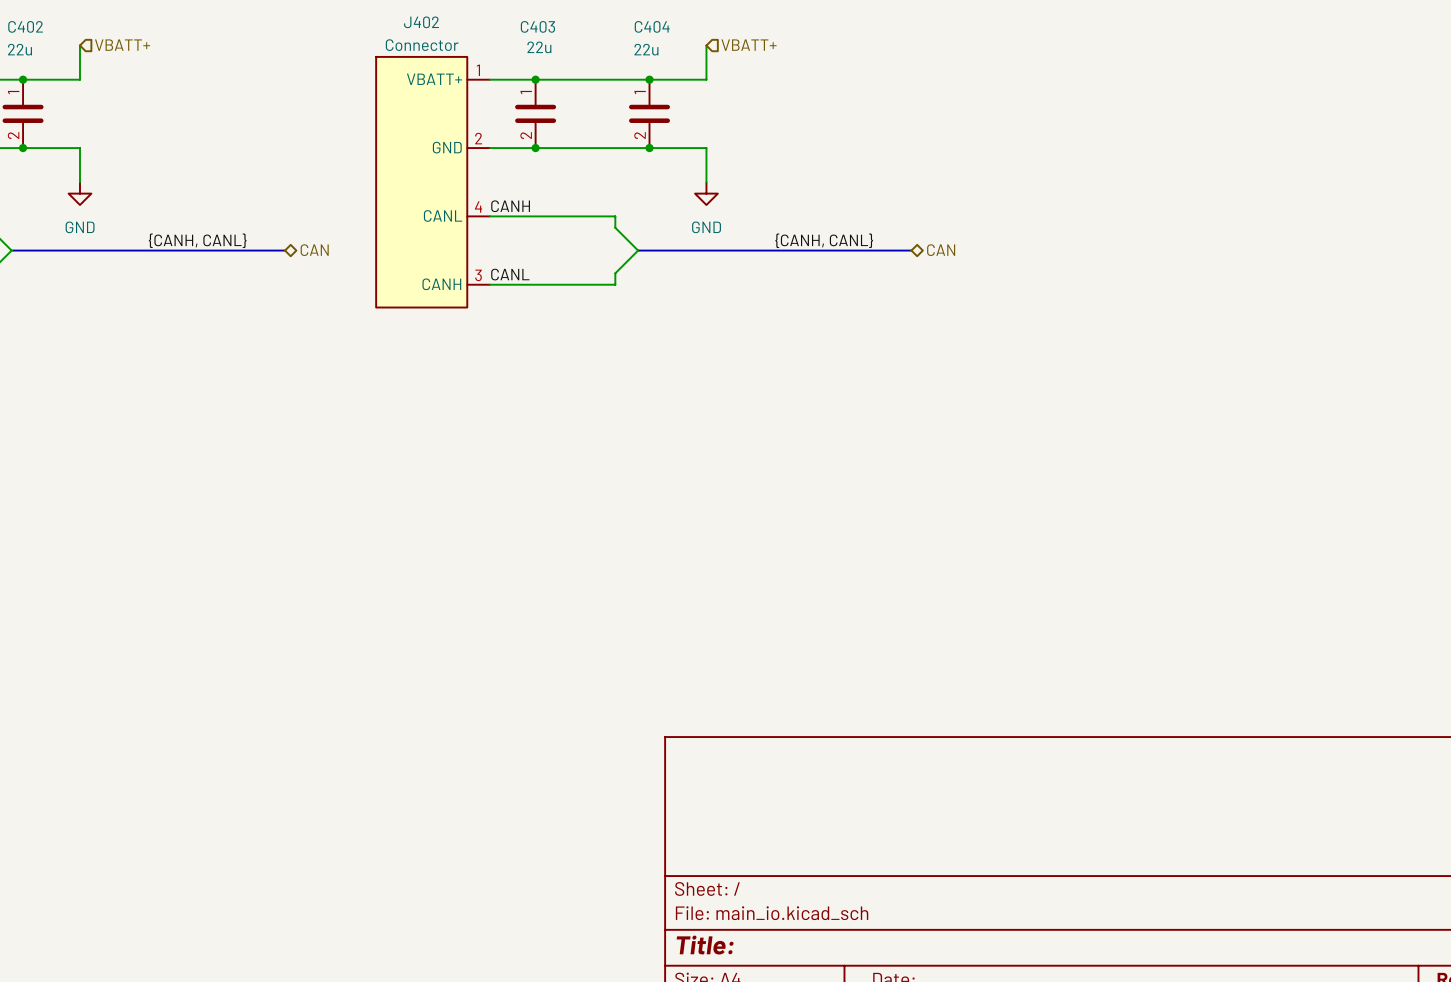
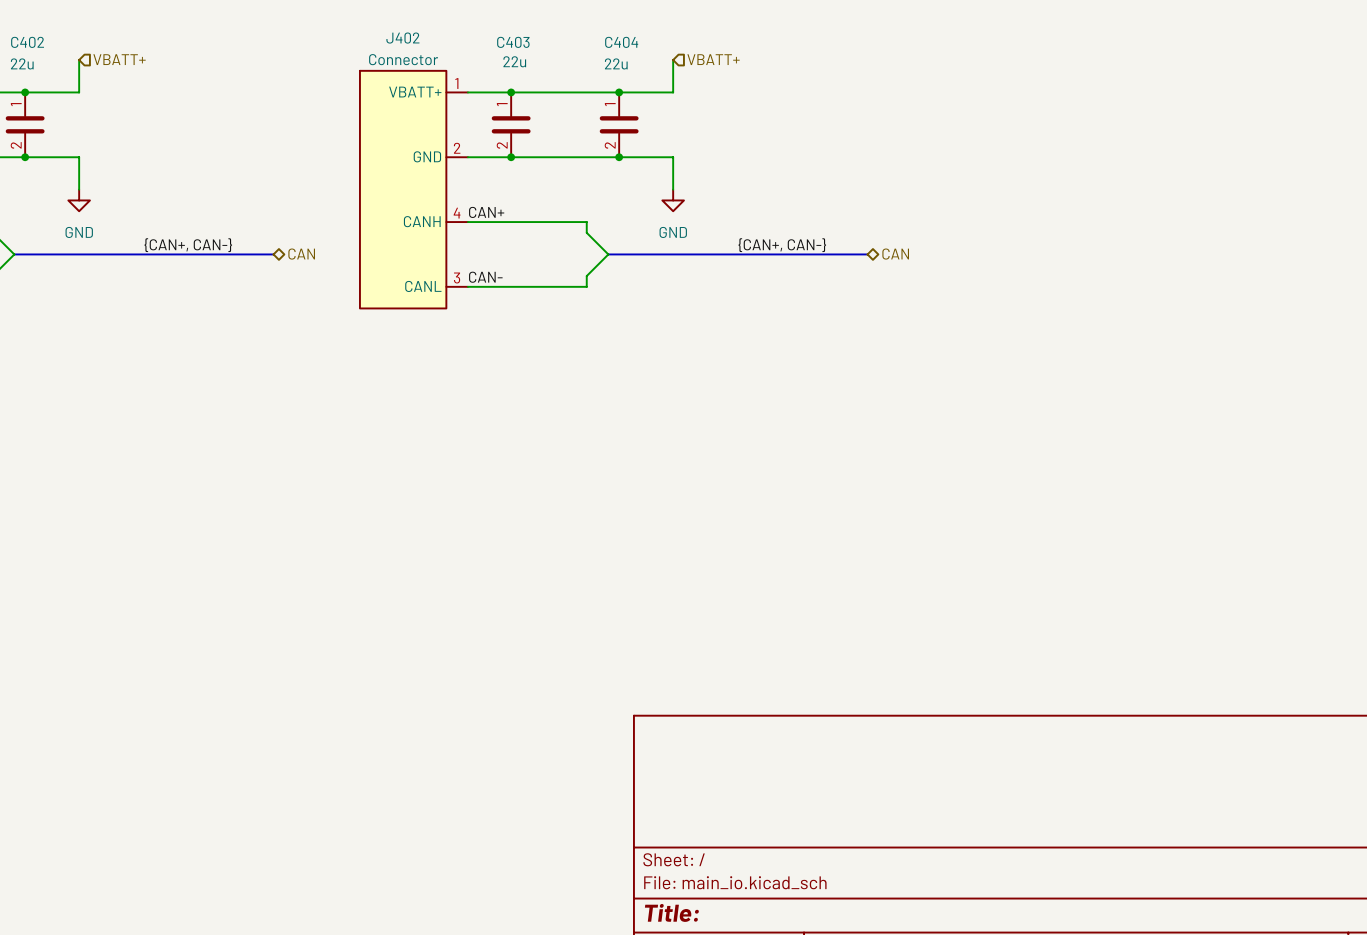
label: CANH (510, 206) -> CAN+ (486, 212)
J402 pin name: CANL (443, 215) -> CANH (422, 221)
label: {CANH, CANL} (197, 240) -> {CAN+, CAN-} (188, 245)
label: {CANH, CANL} (824, 240) -> {CAN+, CAN-} (782, 245)
label: CANL (510, 274) -> CAN- (485, 277)
J402 pin name: CANH (441, 284) -> CANL (423, 286)

